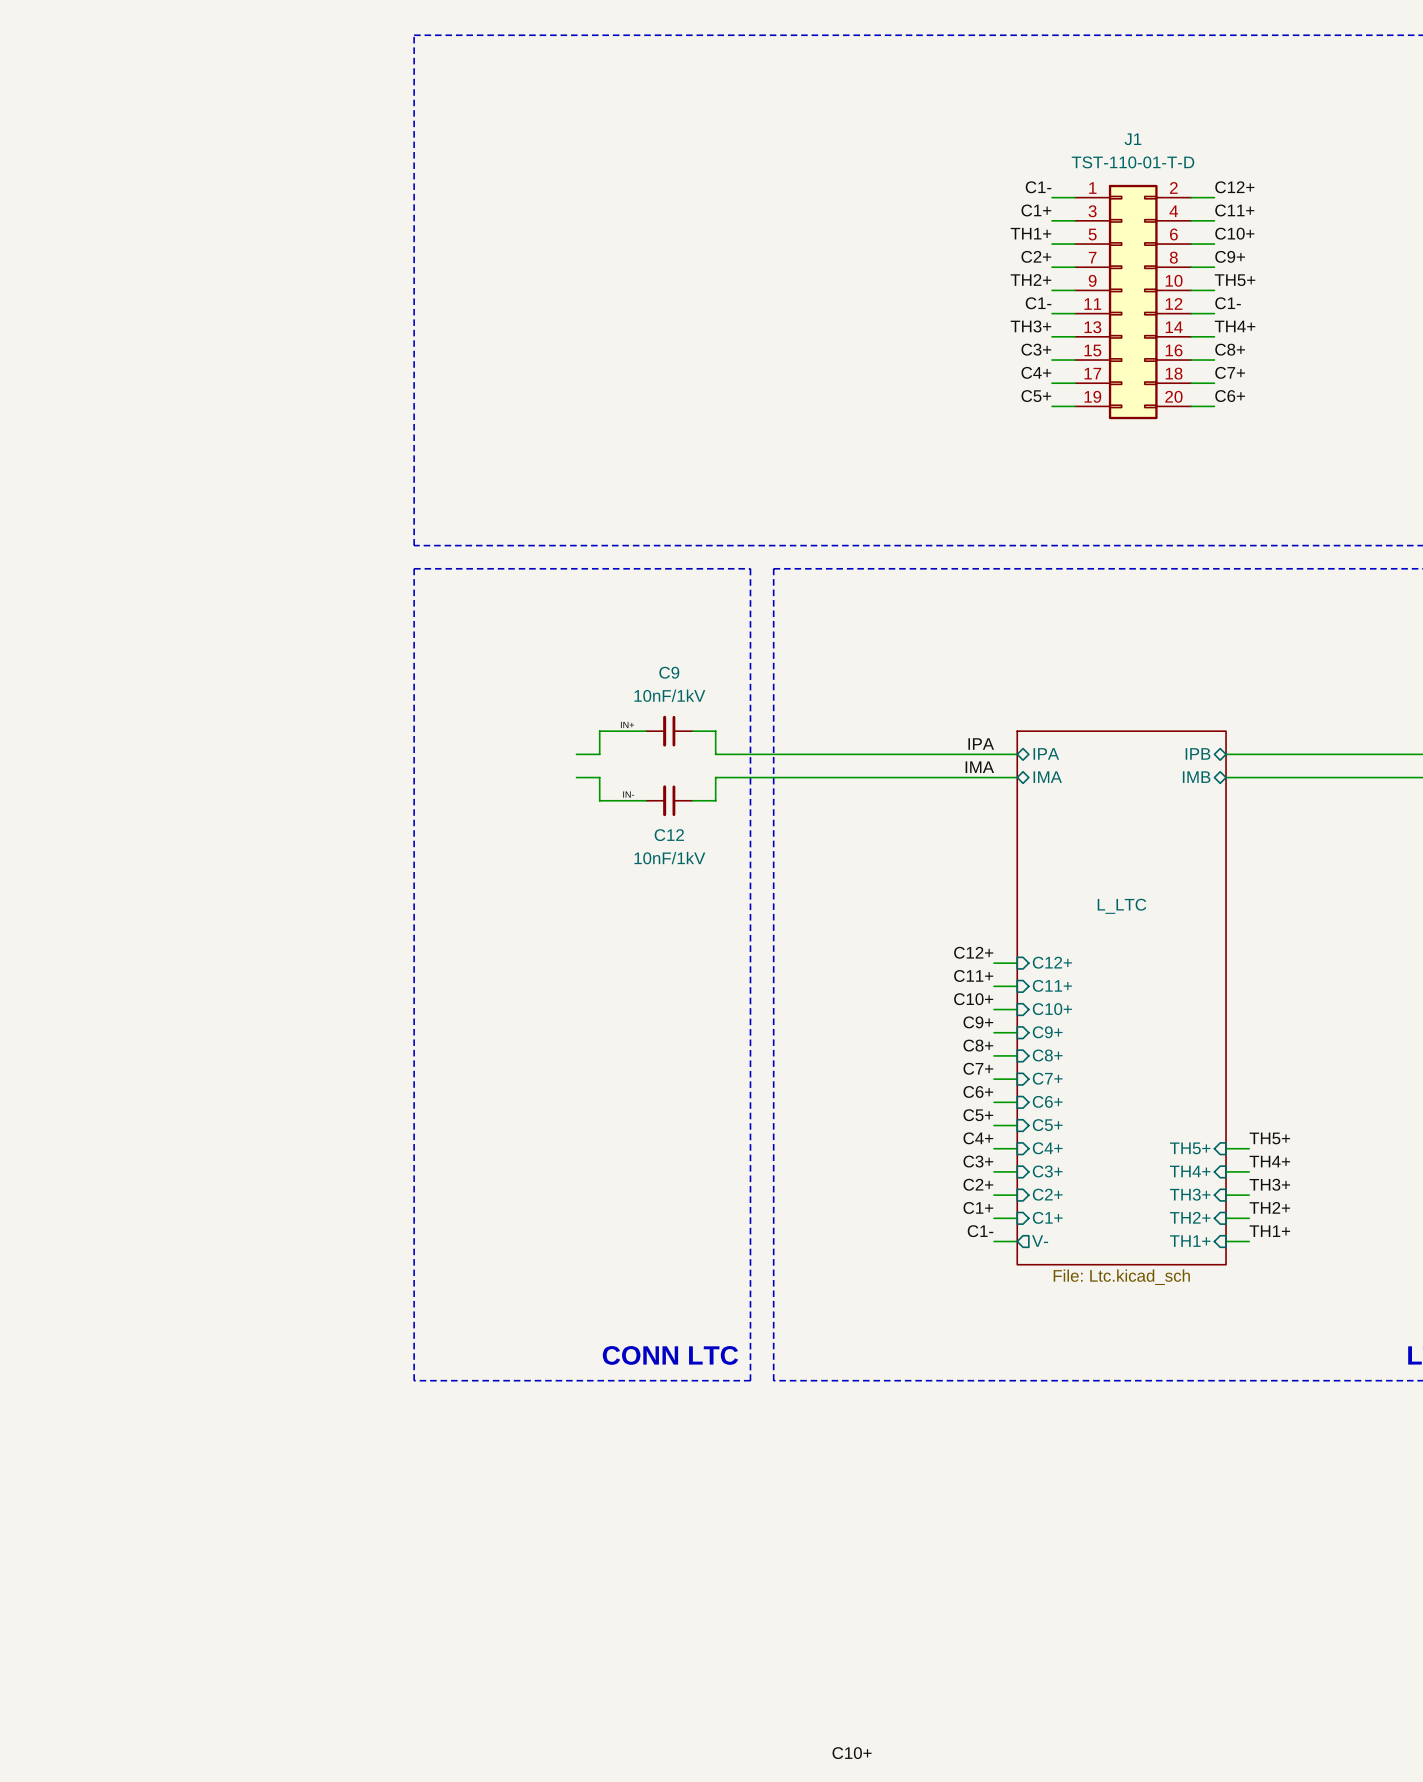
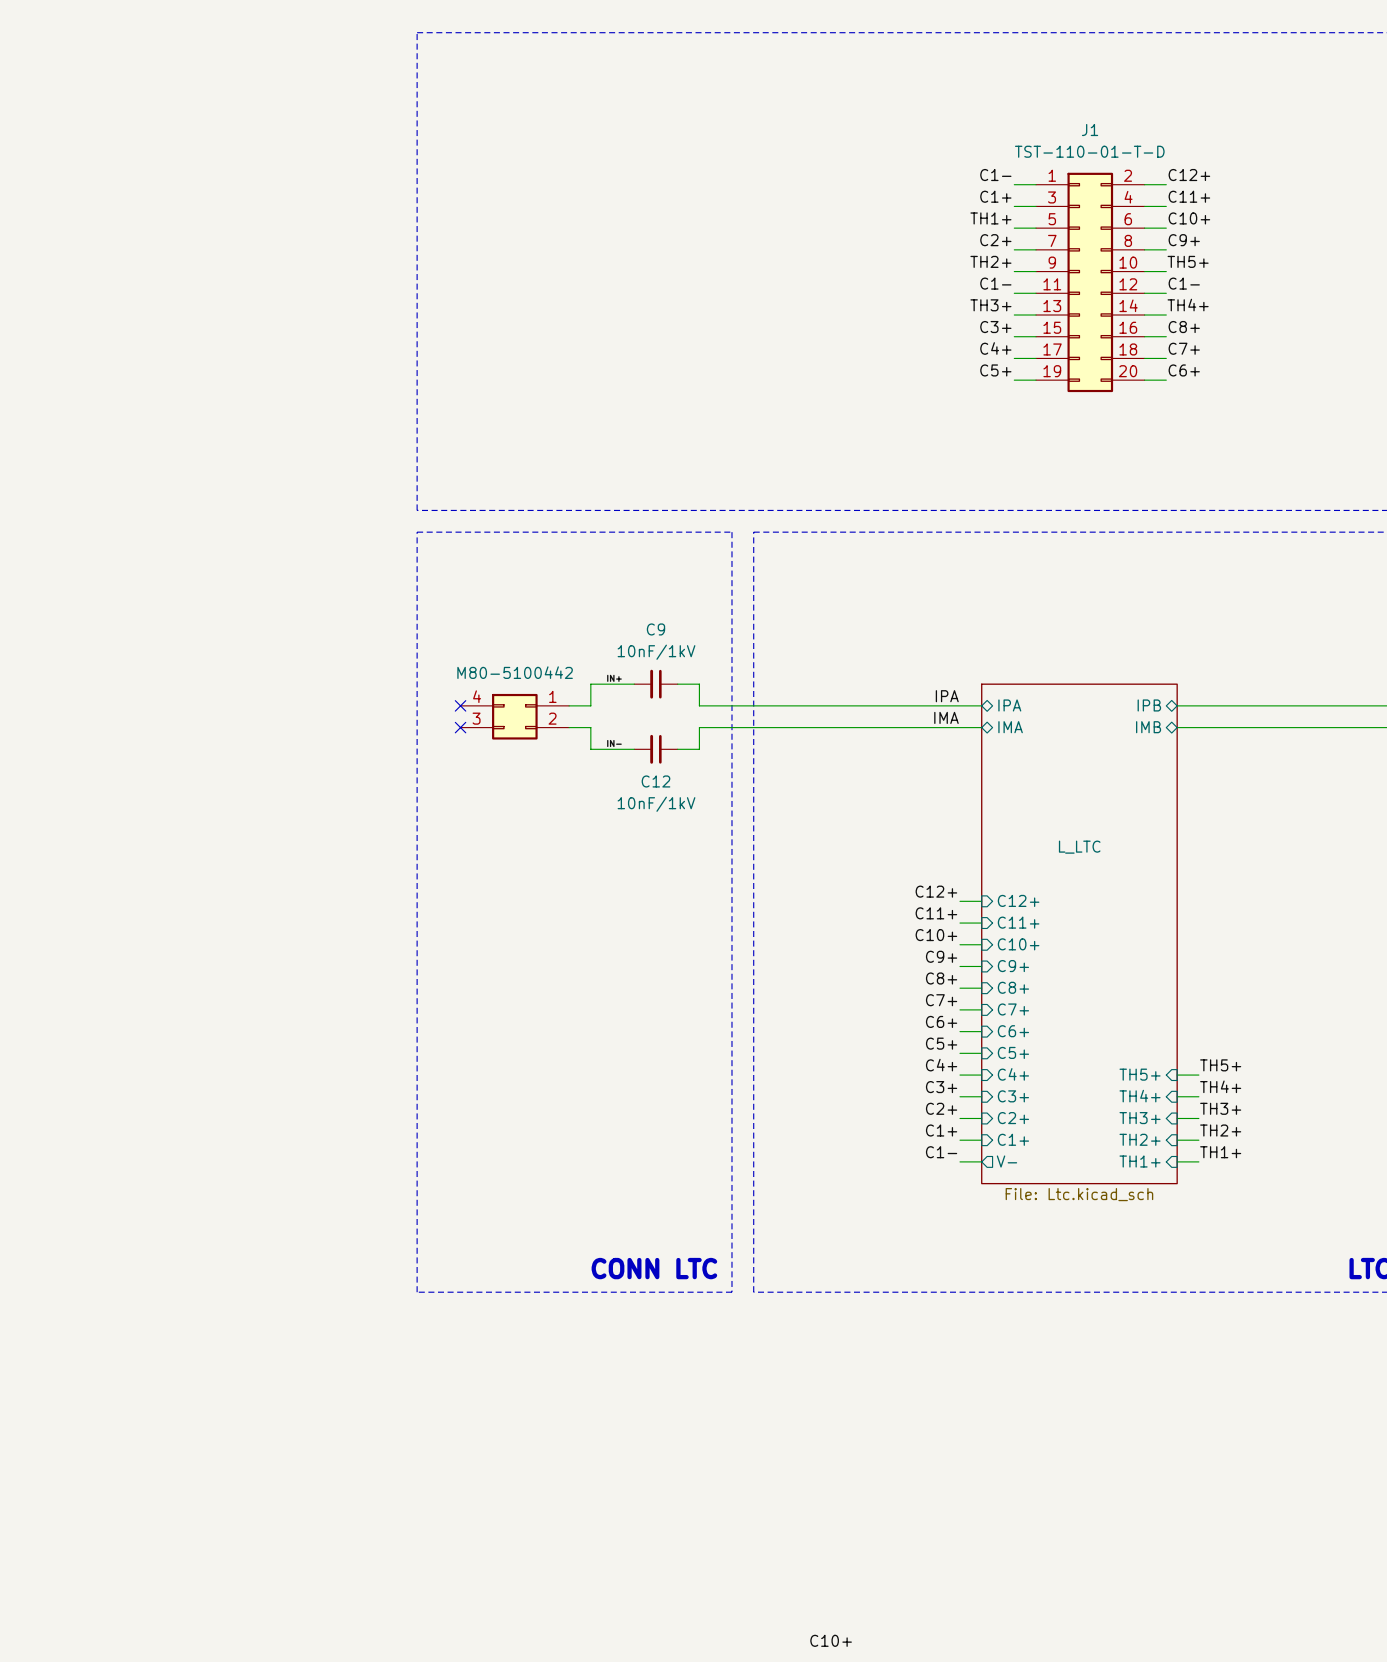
no-connect mark: none -> (460, 705)
part: none -> M80-5100442 (514, 716)
no-connect mark: none -> (460, 727)

